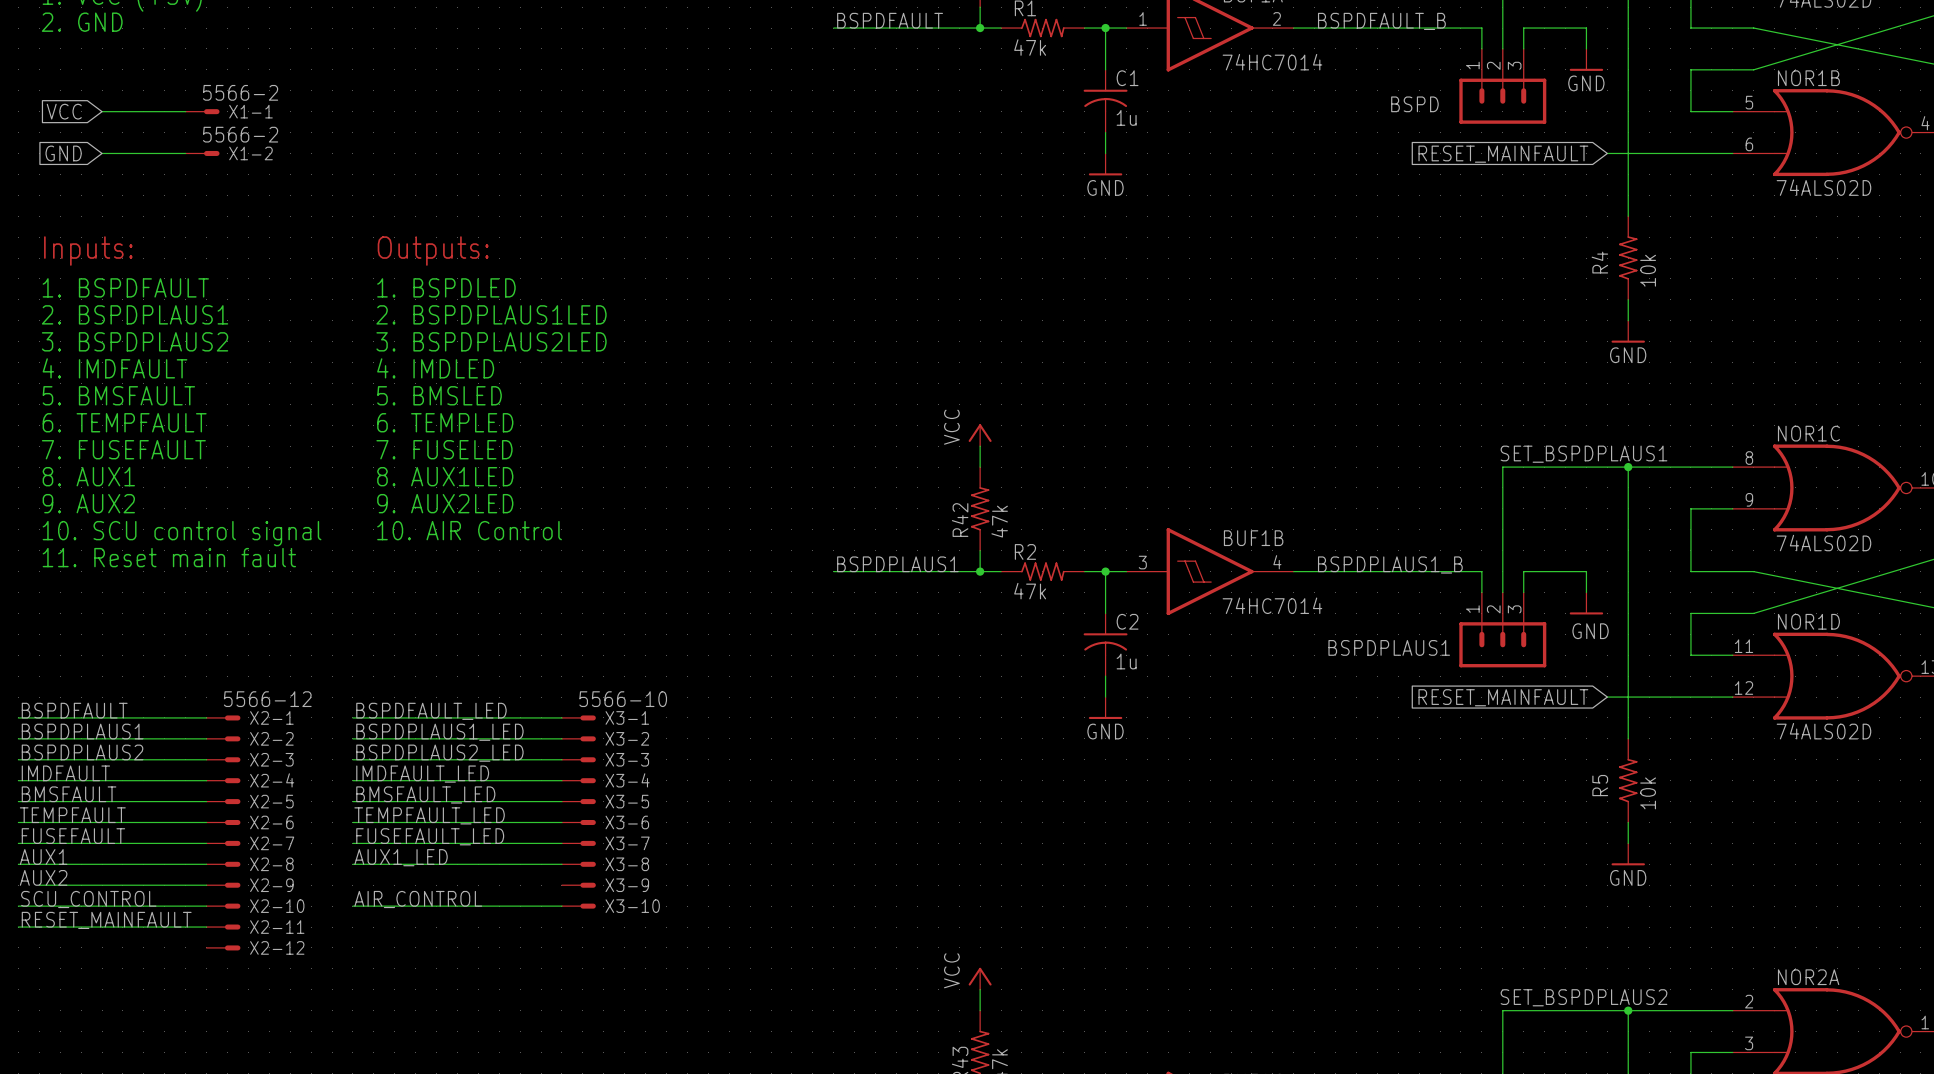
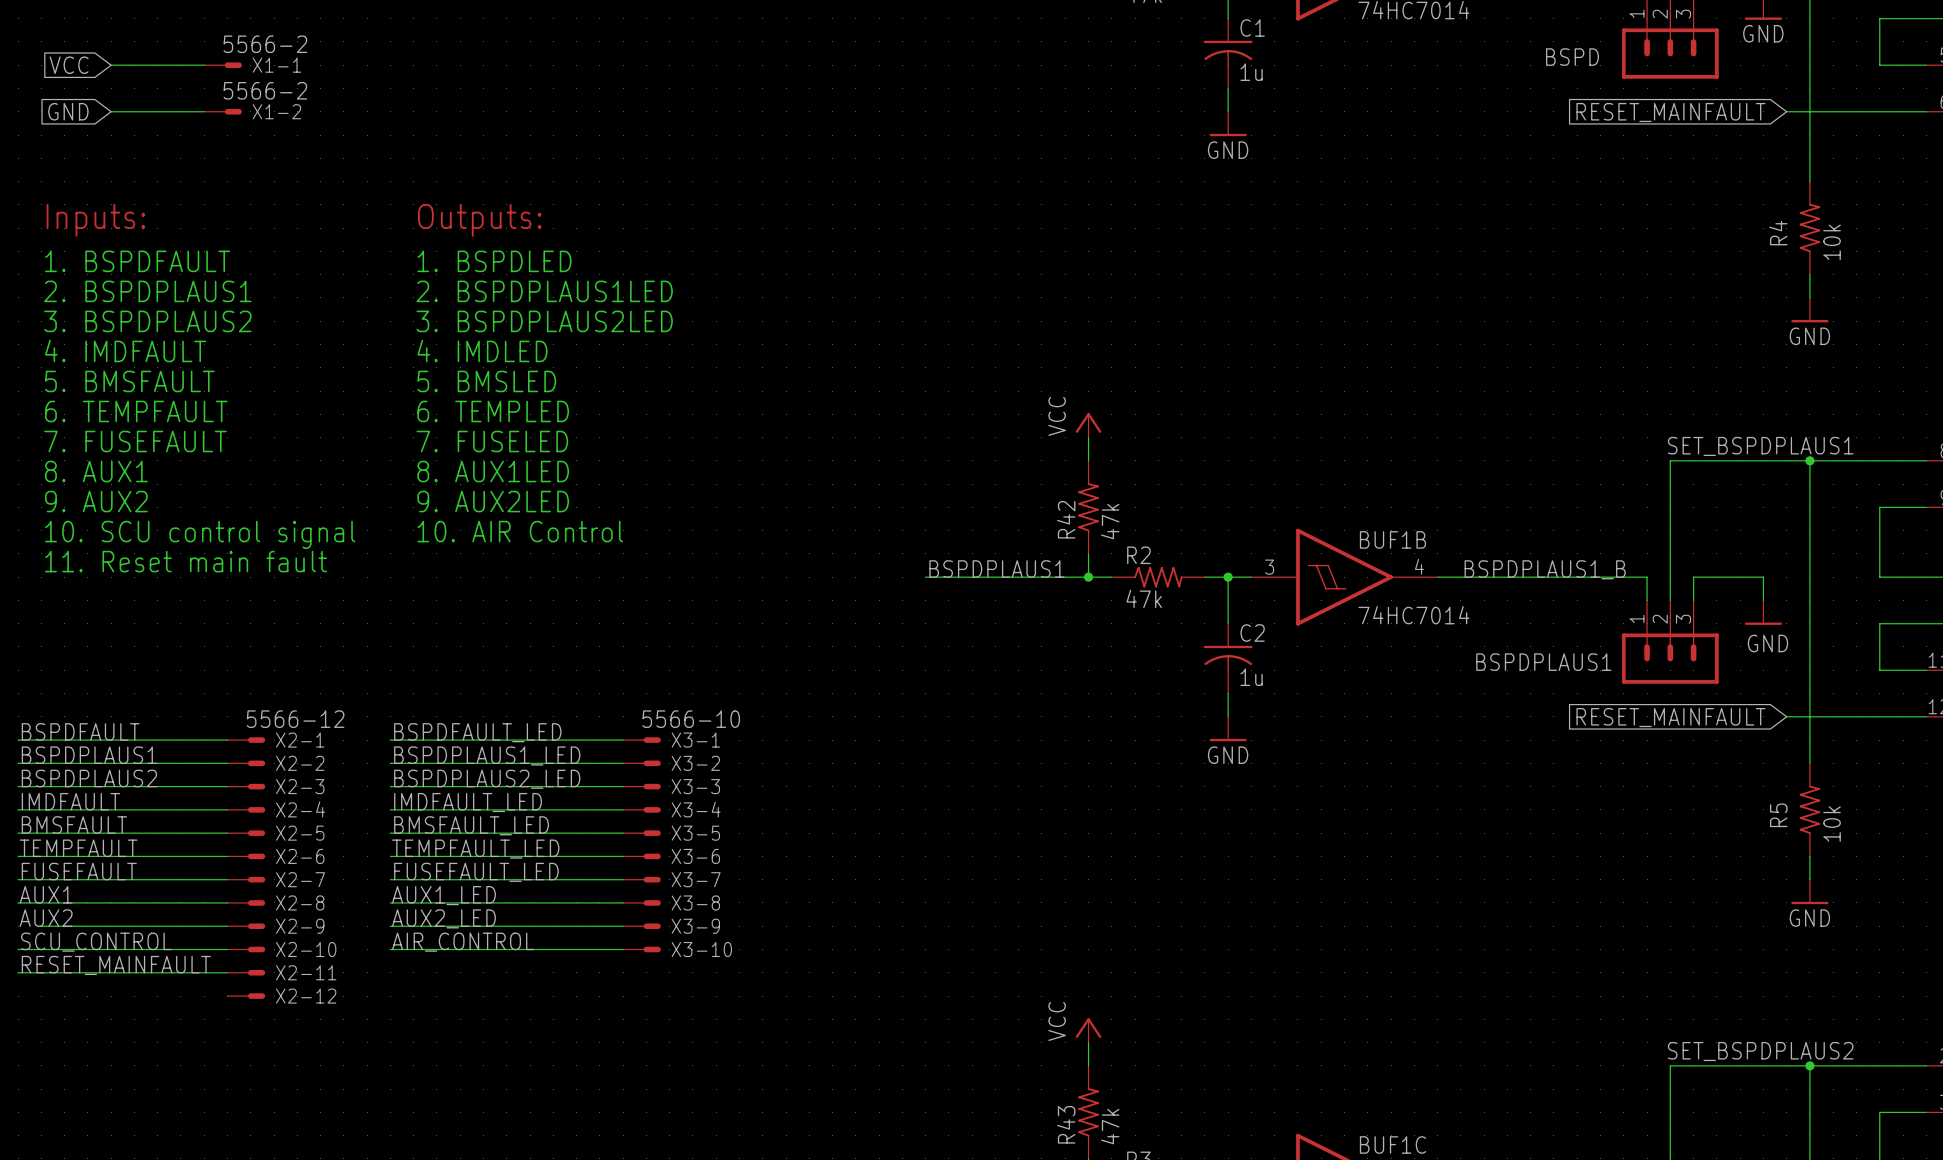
label: none -> AUX2_LED (443, 918)
wire: none -> (390, 926) (623, 926)

